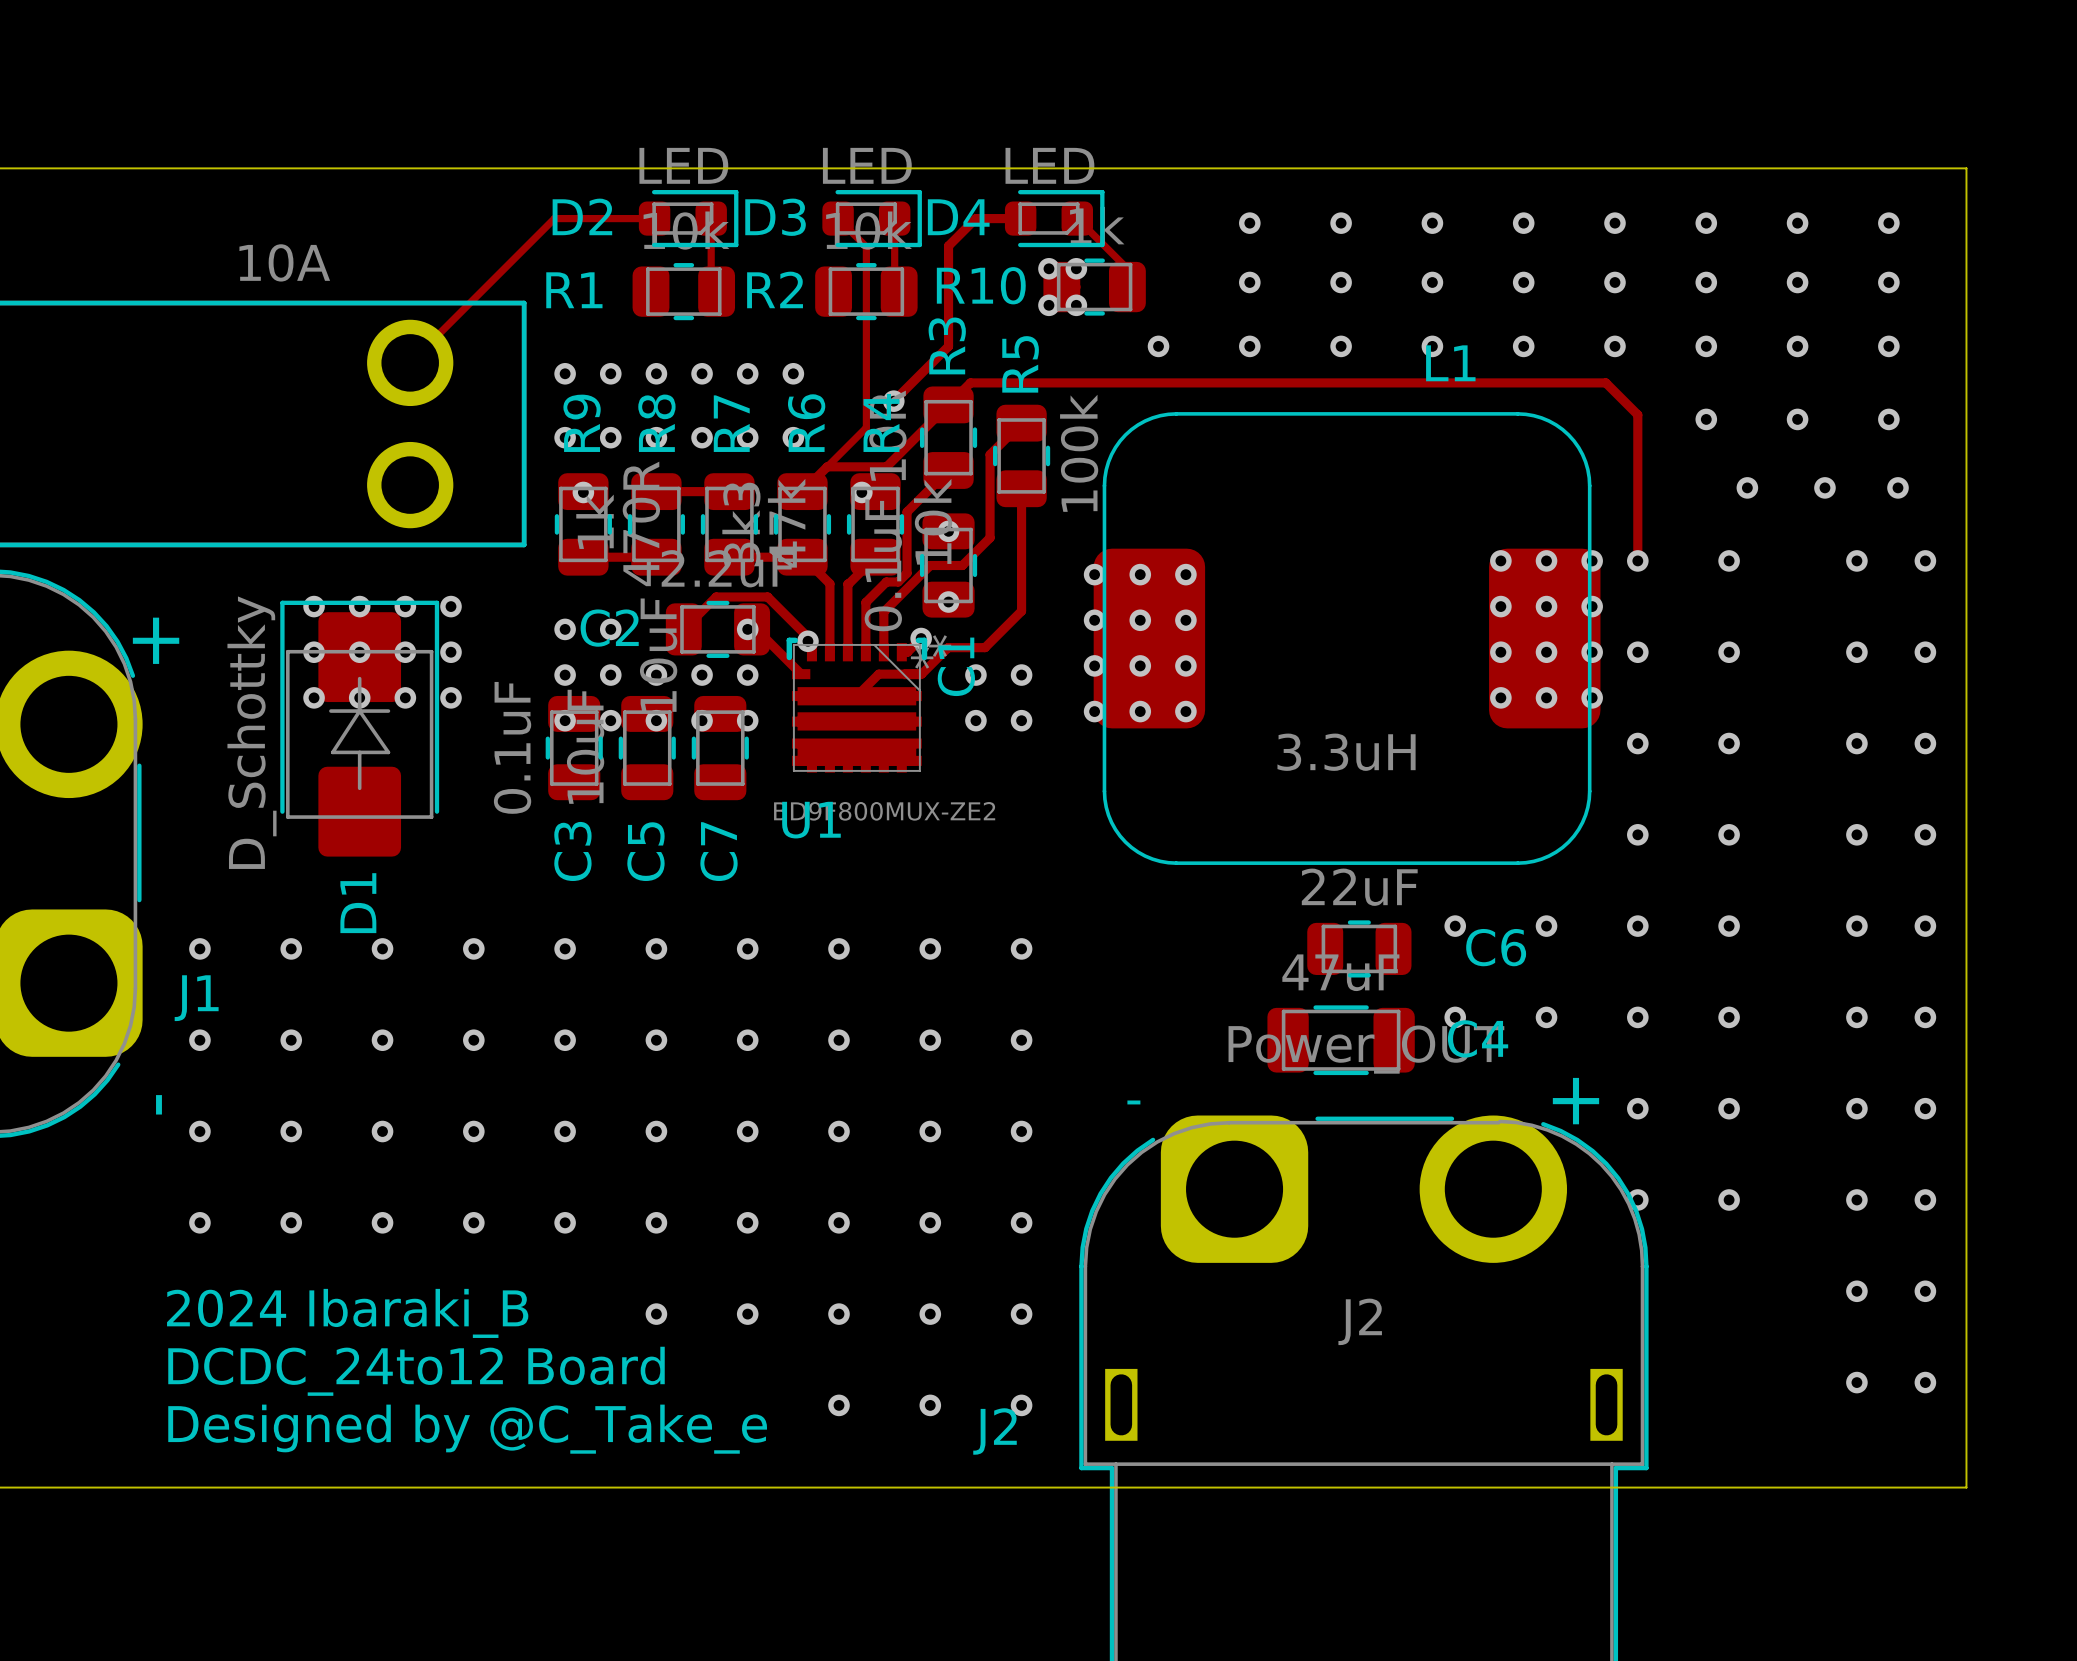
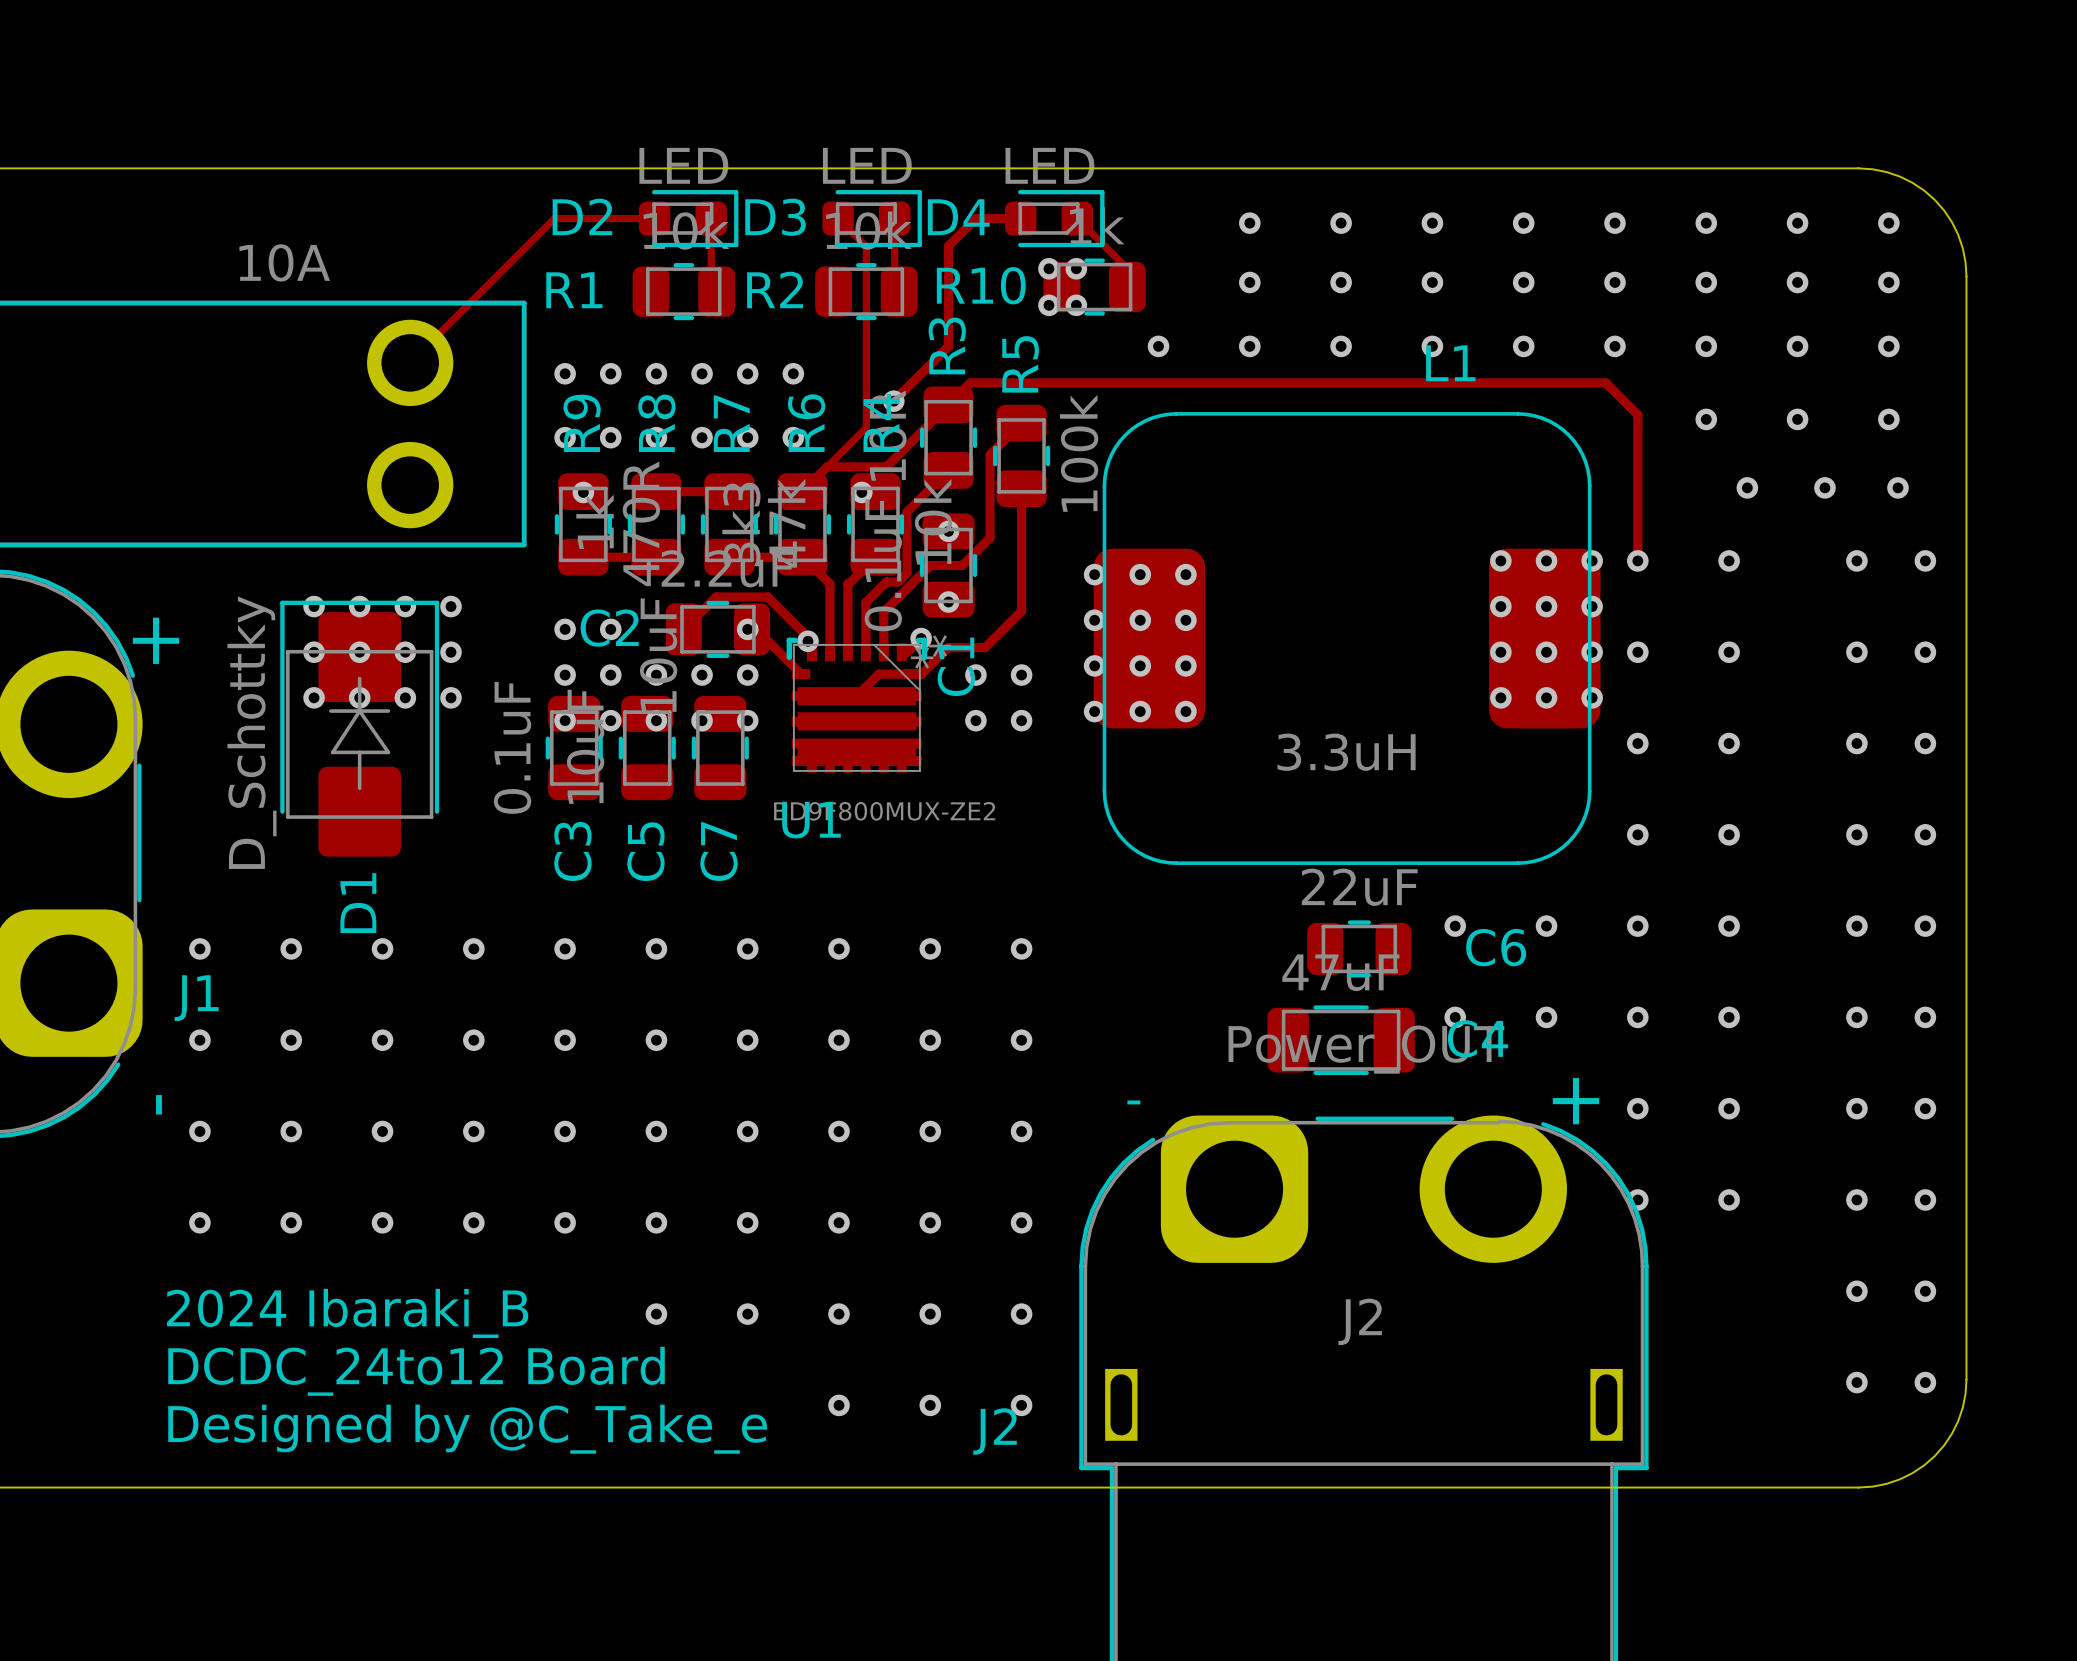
board edge: (1858, 168) (1966, 168) (1966, 276) -> (1858, 168) (1886, 172) (1899, 176) (1924, 190) (1934, 199) (1952, 222) (1958, 234) (1965, 262) (1966, 276)
board edge: (1966, 1379) (1966, 1487) (1858, 1487) -> (1966, 1379) (1962, 1407) (1958, 1420) (1952, 1433) (1934, 1455) (1912, 1473) (1899, 1479) (1886, 1483) (1858, 1487)

